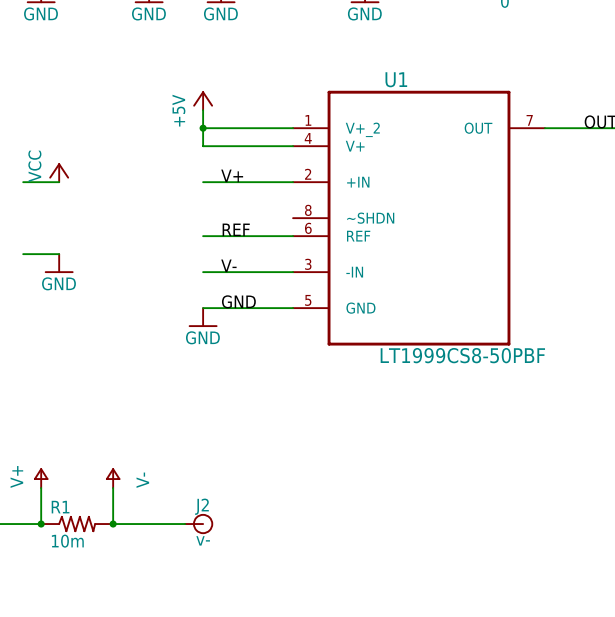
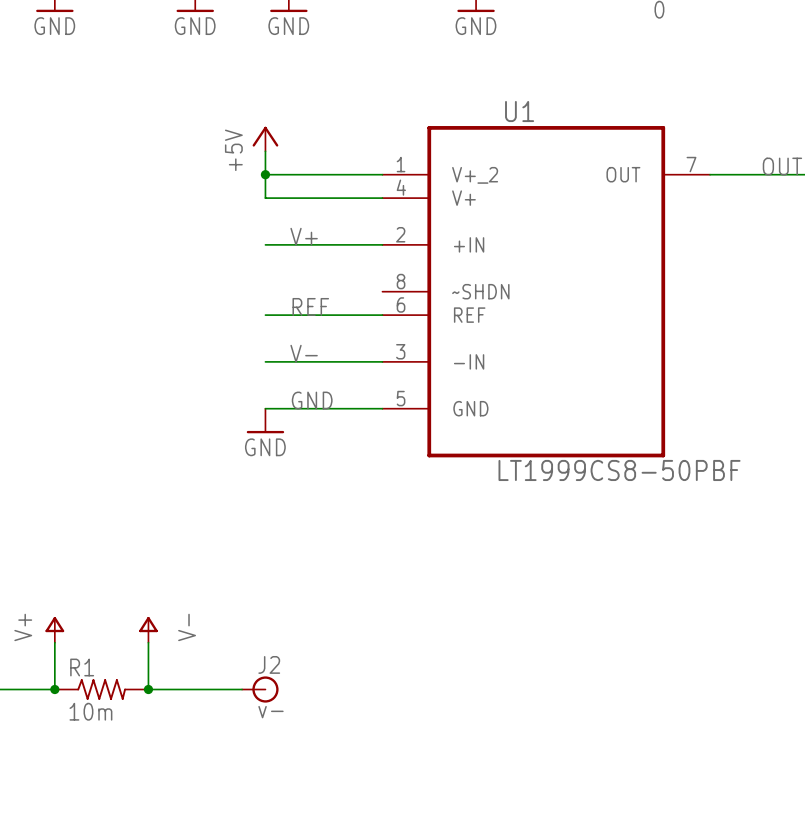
power symbol: VCC (59, 172) -> none
wire: (23, 182) (59, 182) -> none
wire: (23, 254) (59, 254) -> none
power symbol: GND (59, 263) -> none

